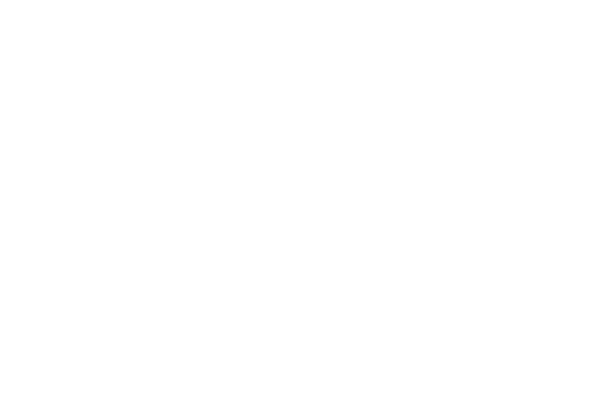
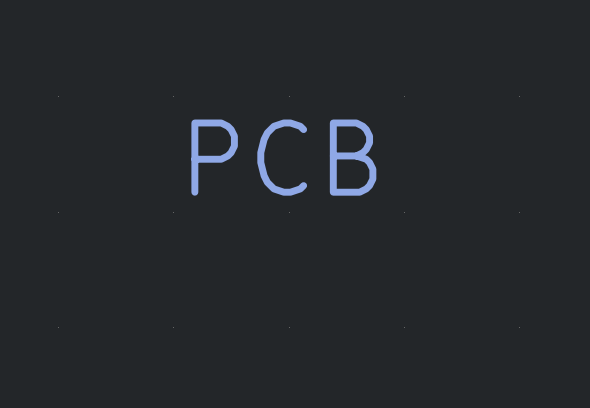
text: none -> PCB (283, 157)

